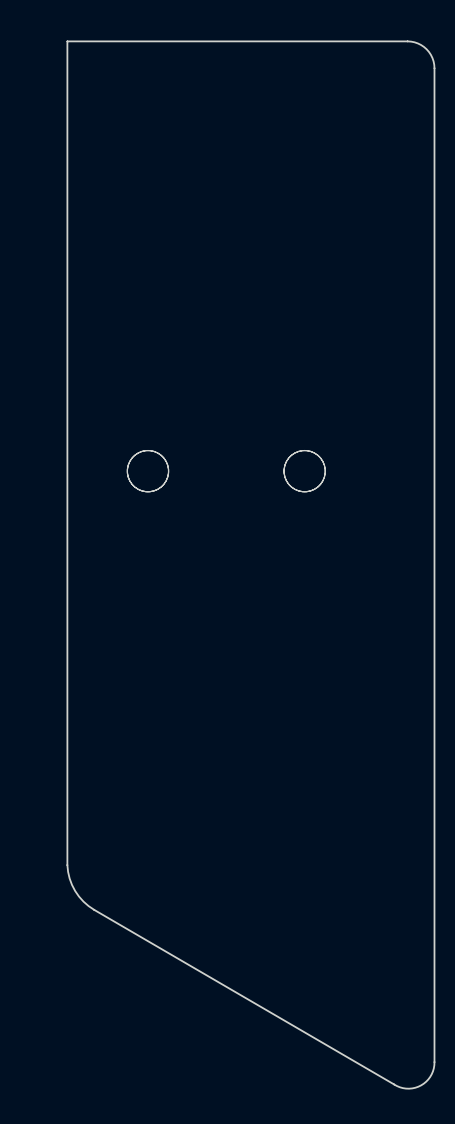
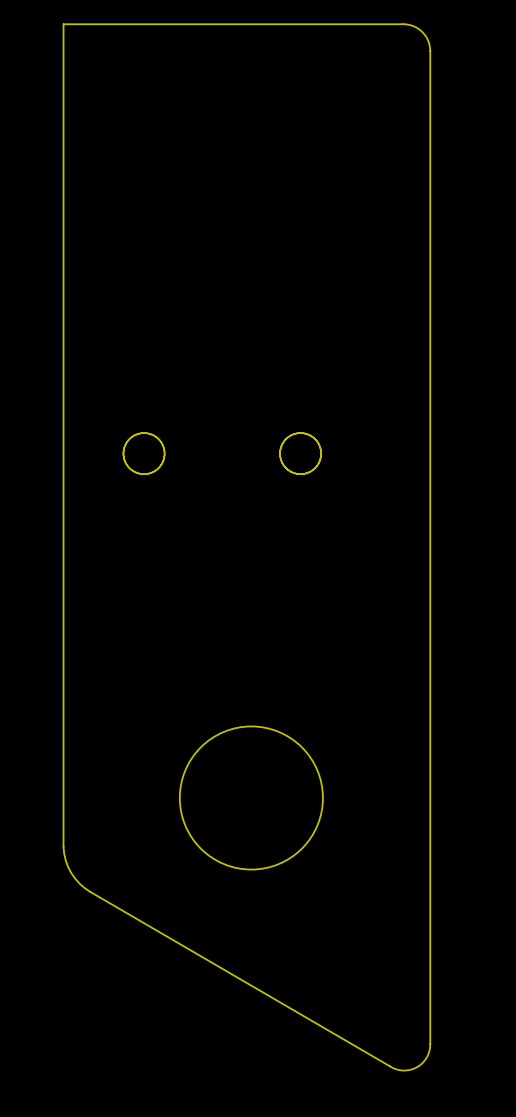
round board edge: none -> [178, 725, 324, 871]

